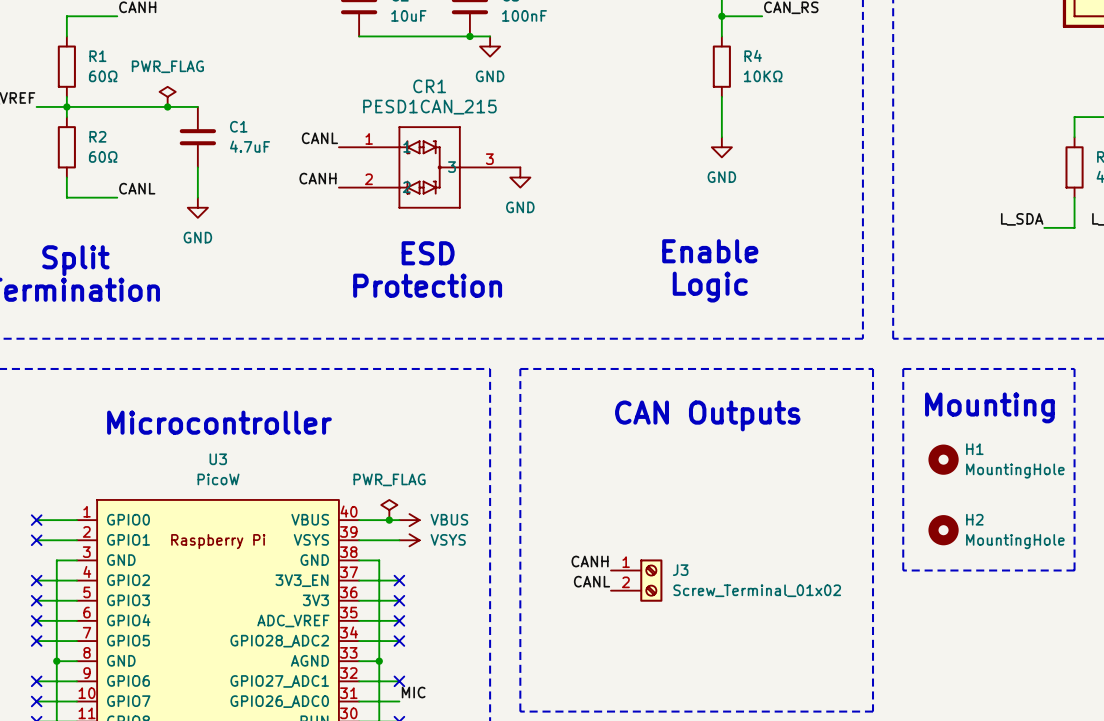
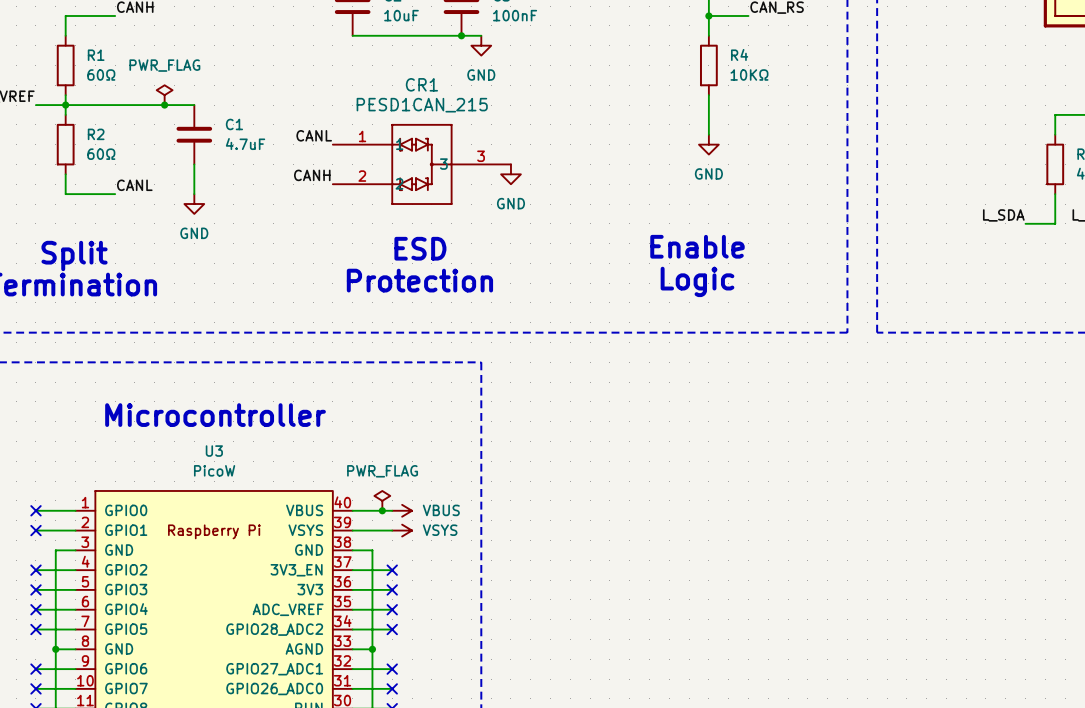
line: (520, 368) (873, 368) (873, 711) (520, 711) (520, 368) -> none
line: (903, 368) (1074, 368) (1074, 570) (903, 570) (903, 368) -> none
text: Mounting (989, 407) -> none
text: CAN Outputs (707, 415) -> none
H1: MountingHole (943, 459) -> none
H2: MountingHole (943, 530) -> none
label: CANH (590, 561) -> none
J3: Screw_Terminal_01x02 (636, 580) -> none
label: CANL (591, 581) -> none
label: MIC (413, 692) -> none
no-connect mark: none -> (392, 688)

